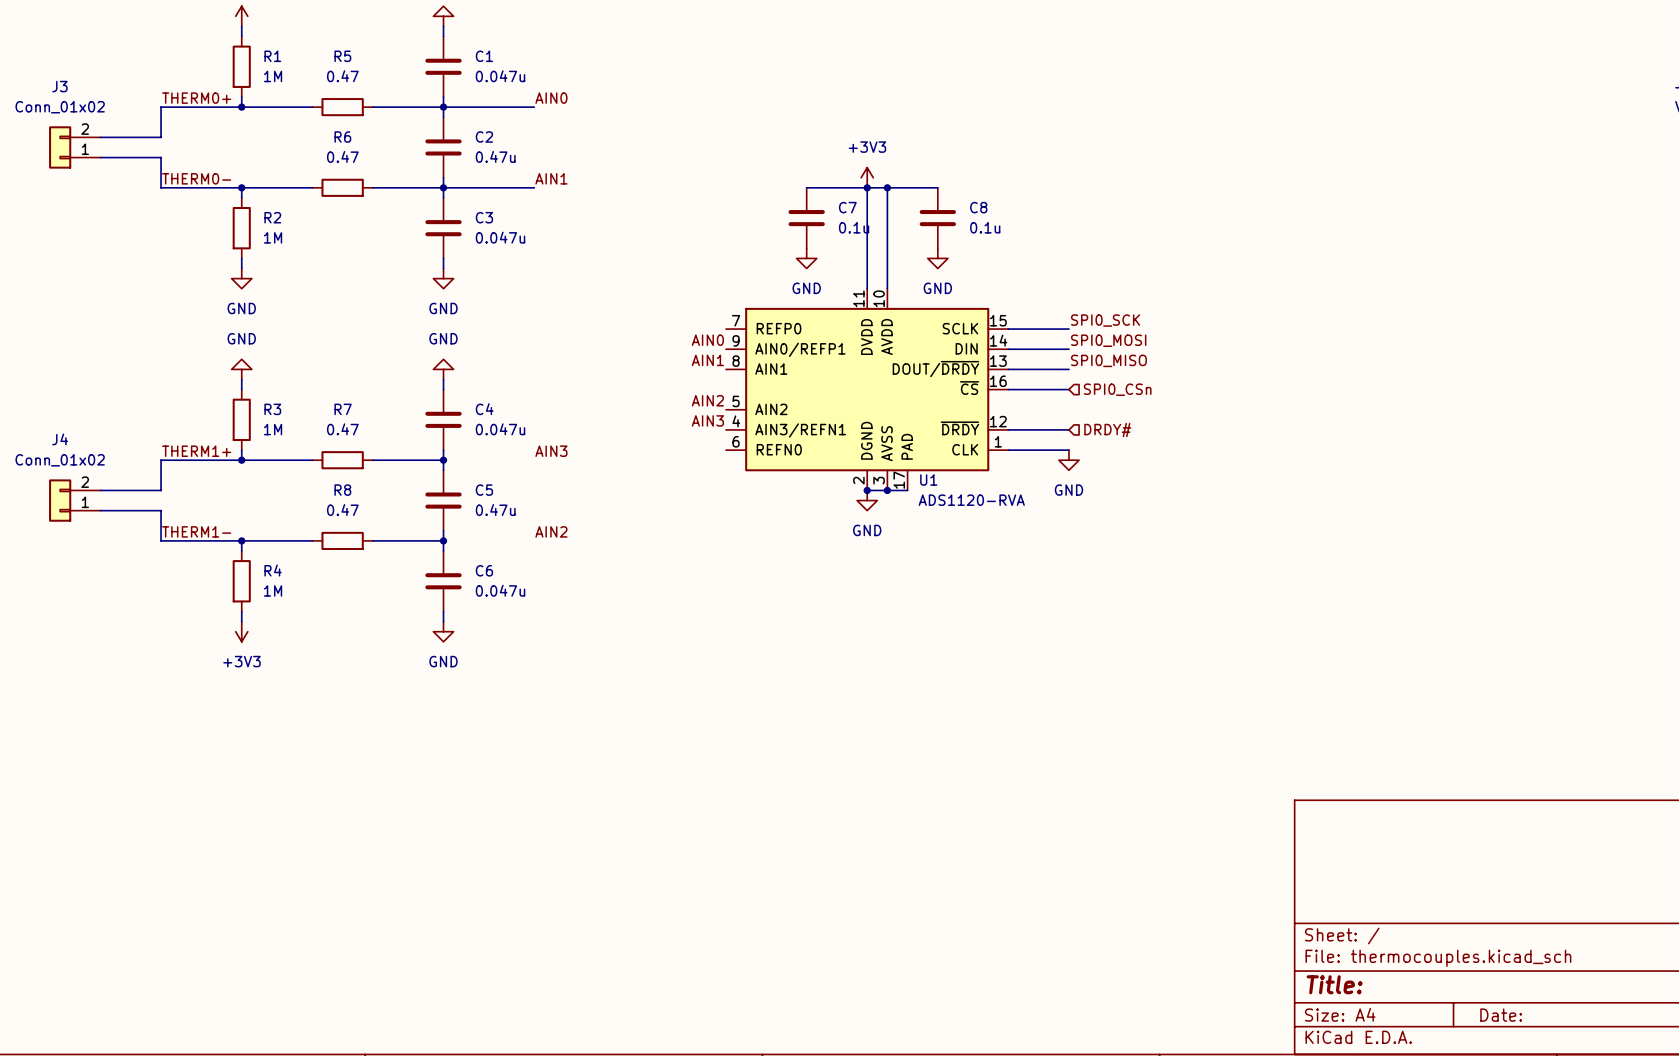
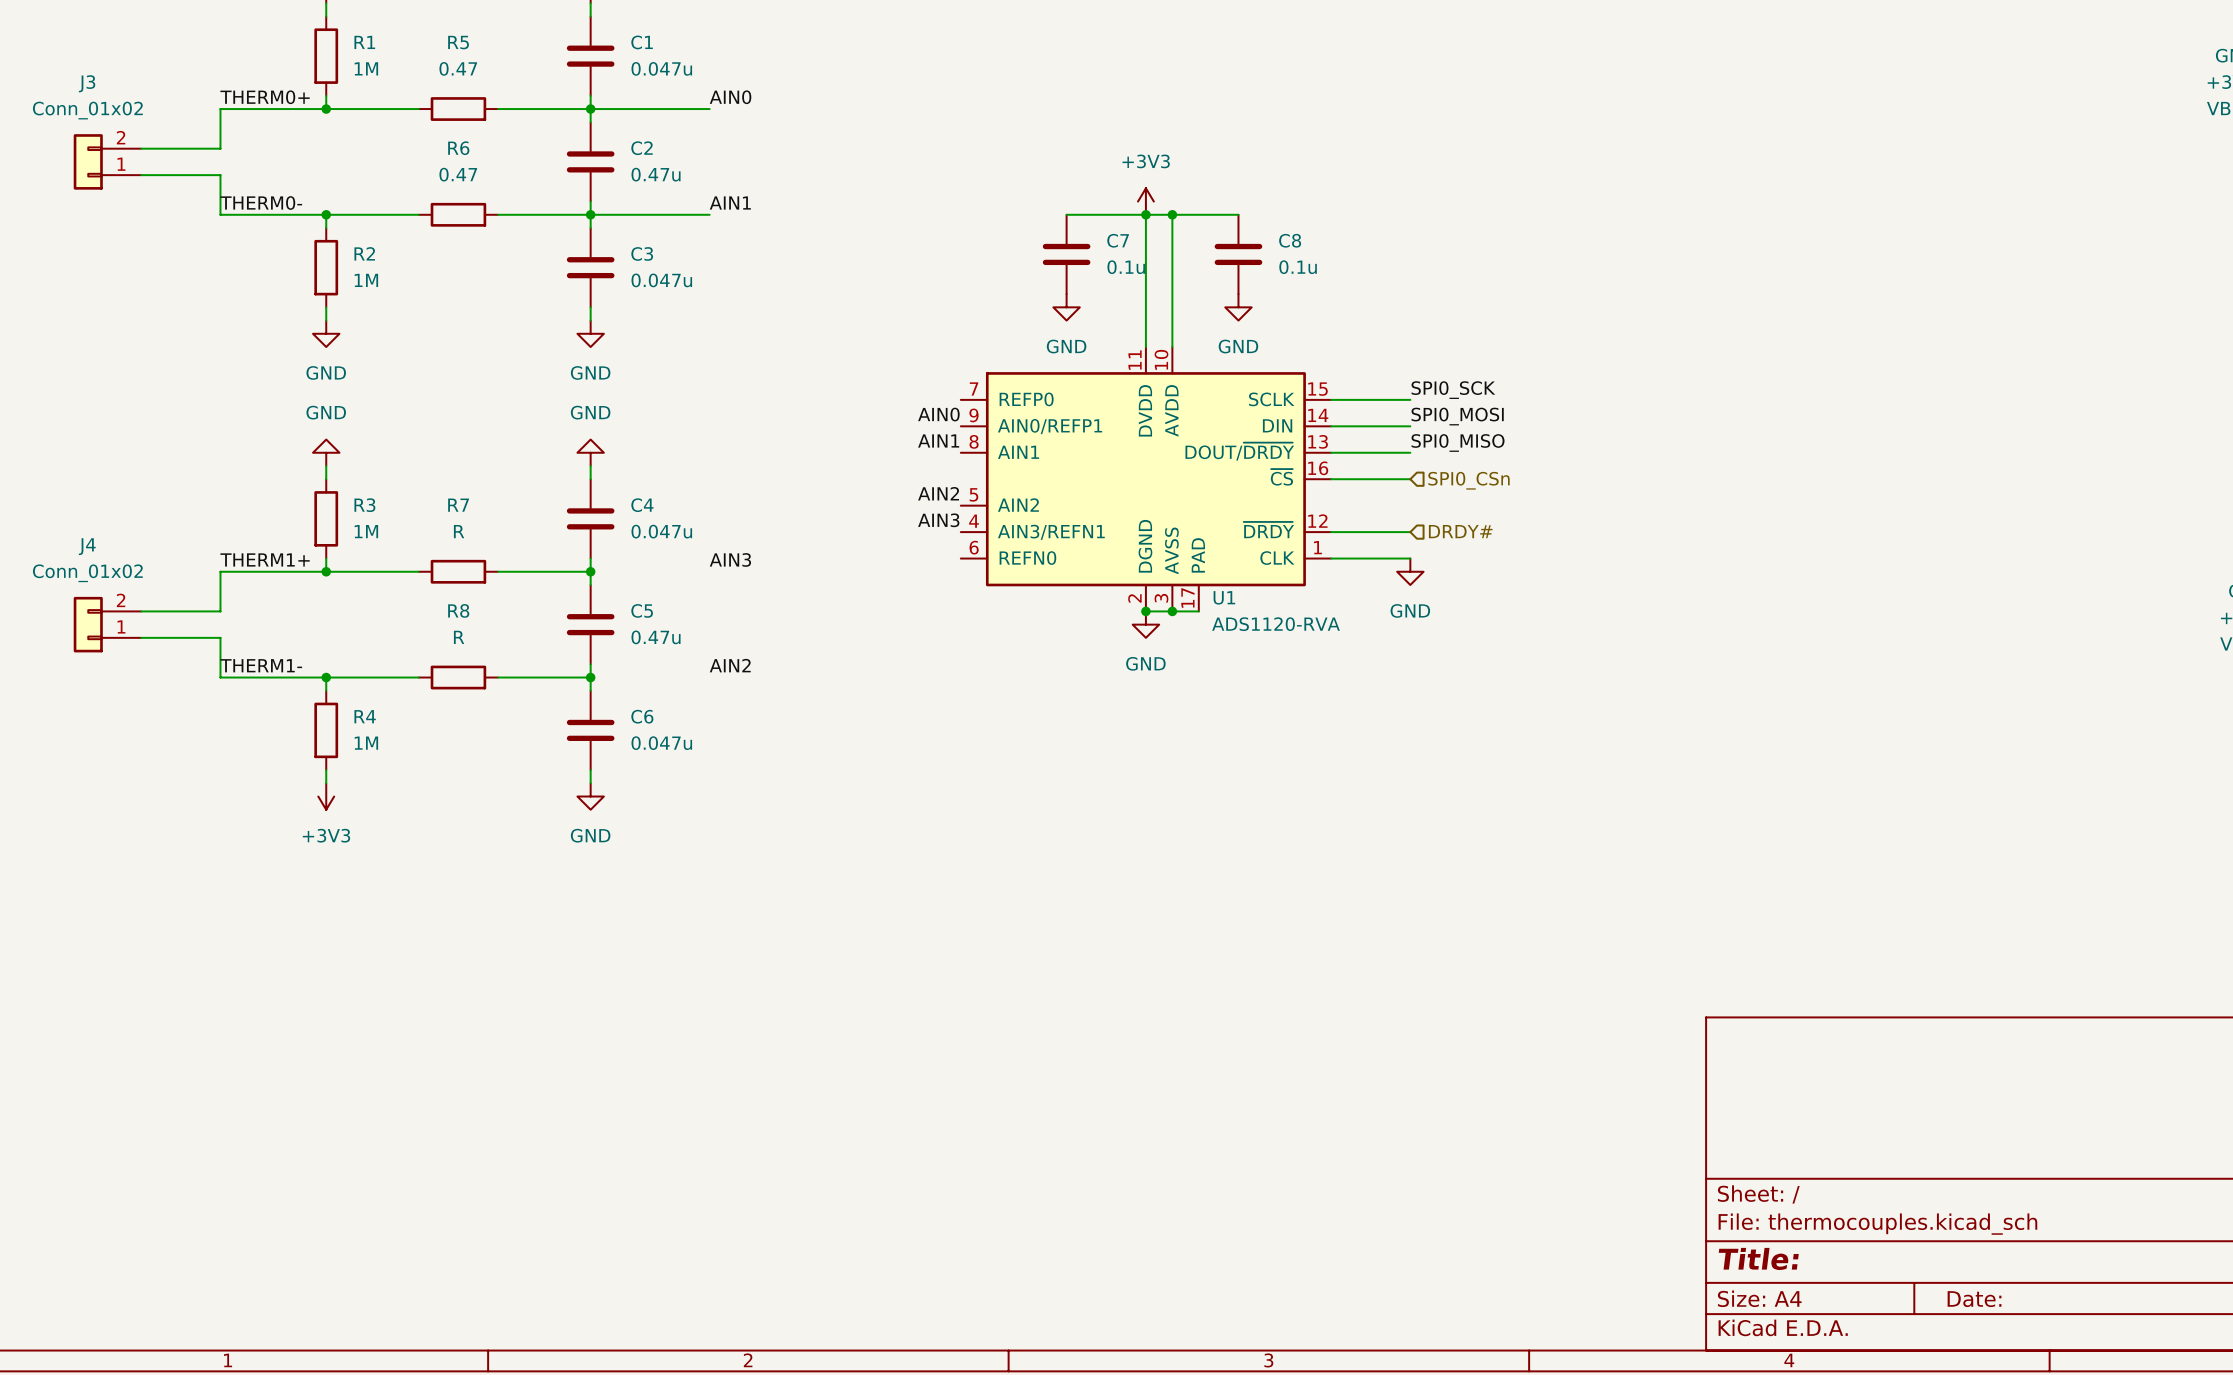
R7 value: 0.47 (342, 429) -> R (459, 531)
R8 value: 0.47 (342, 510) -> R (459, 637)

